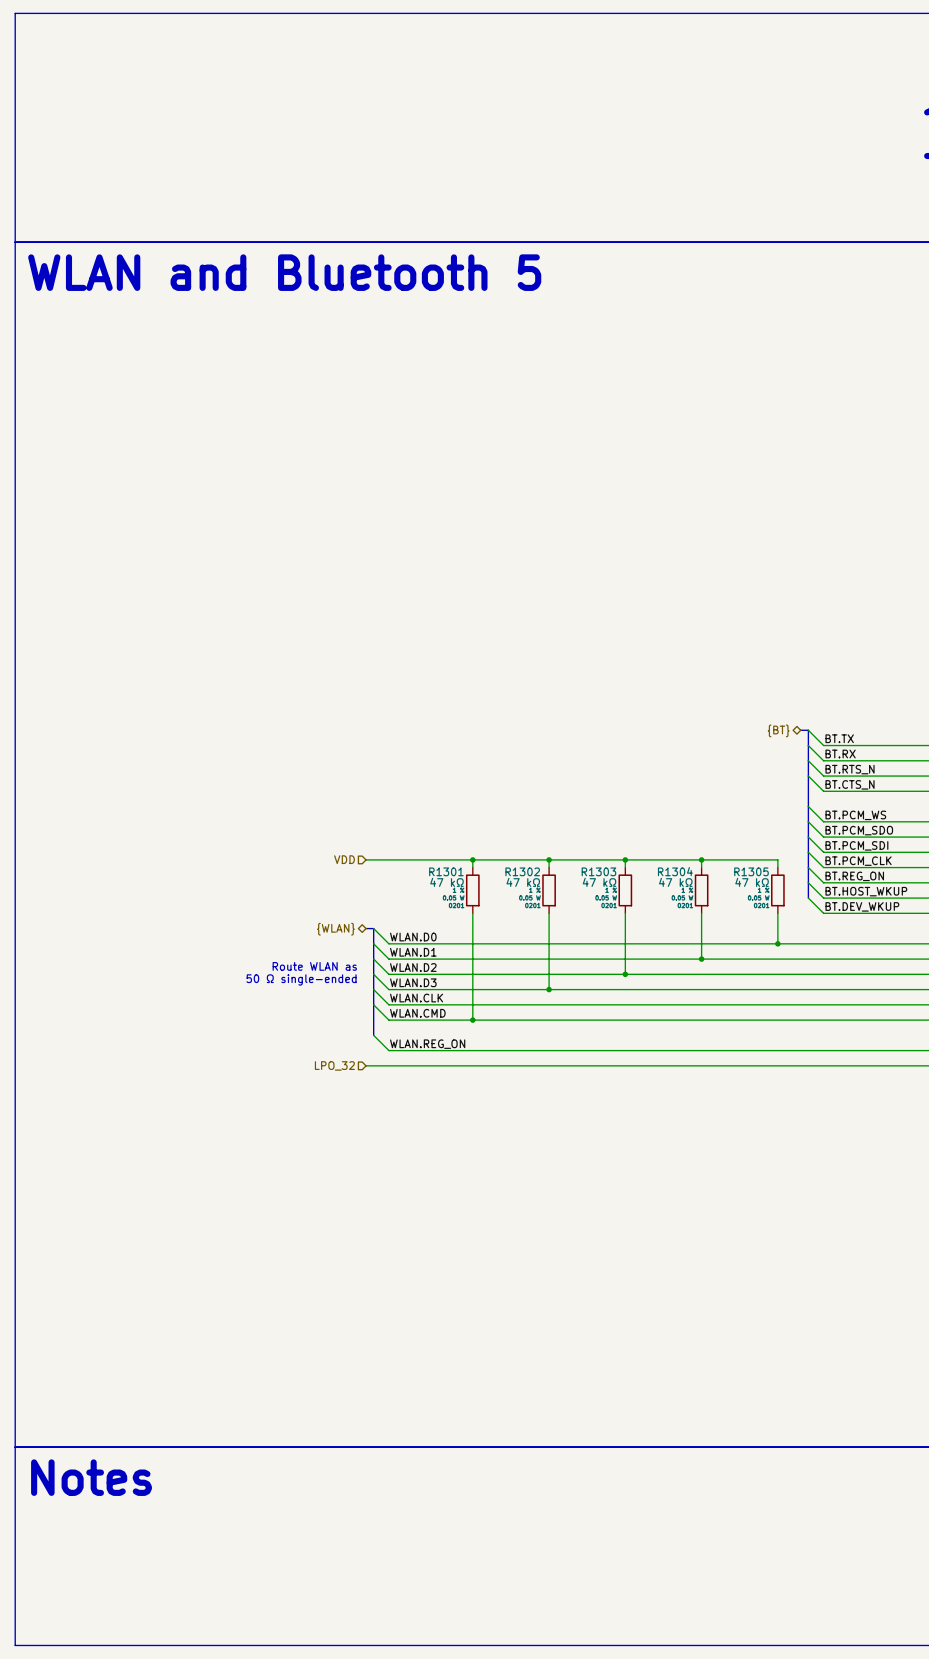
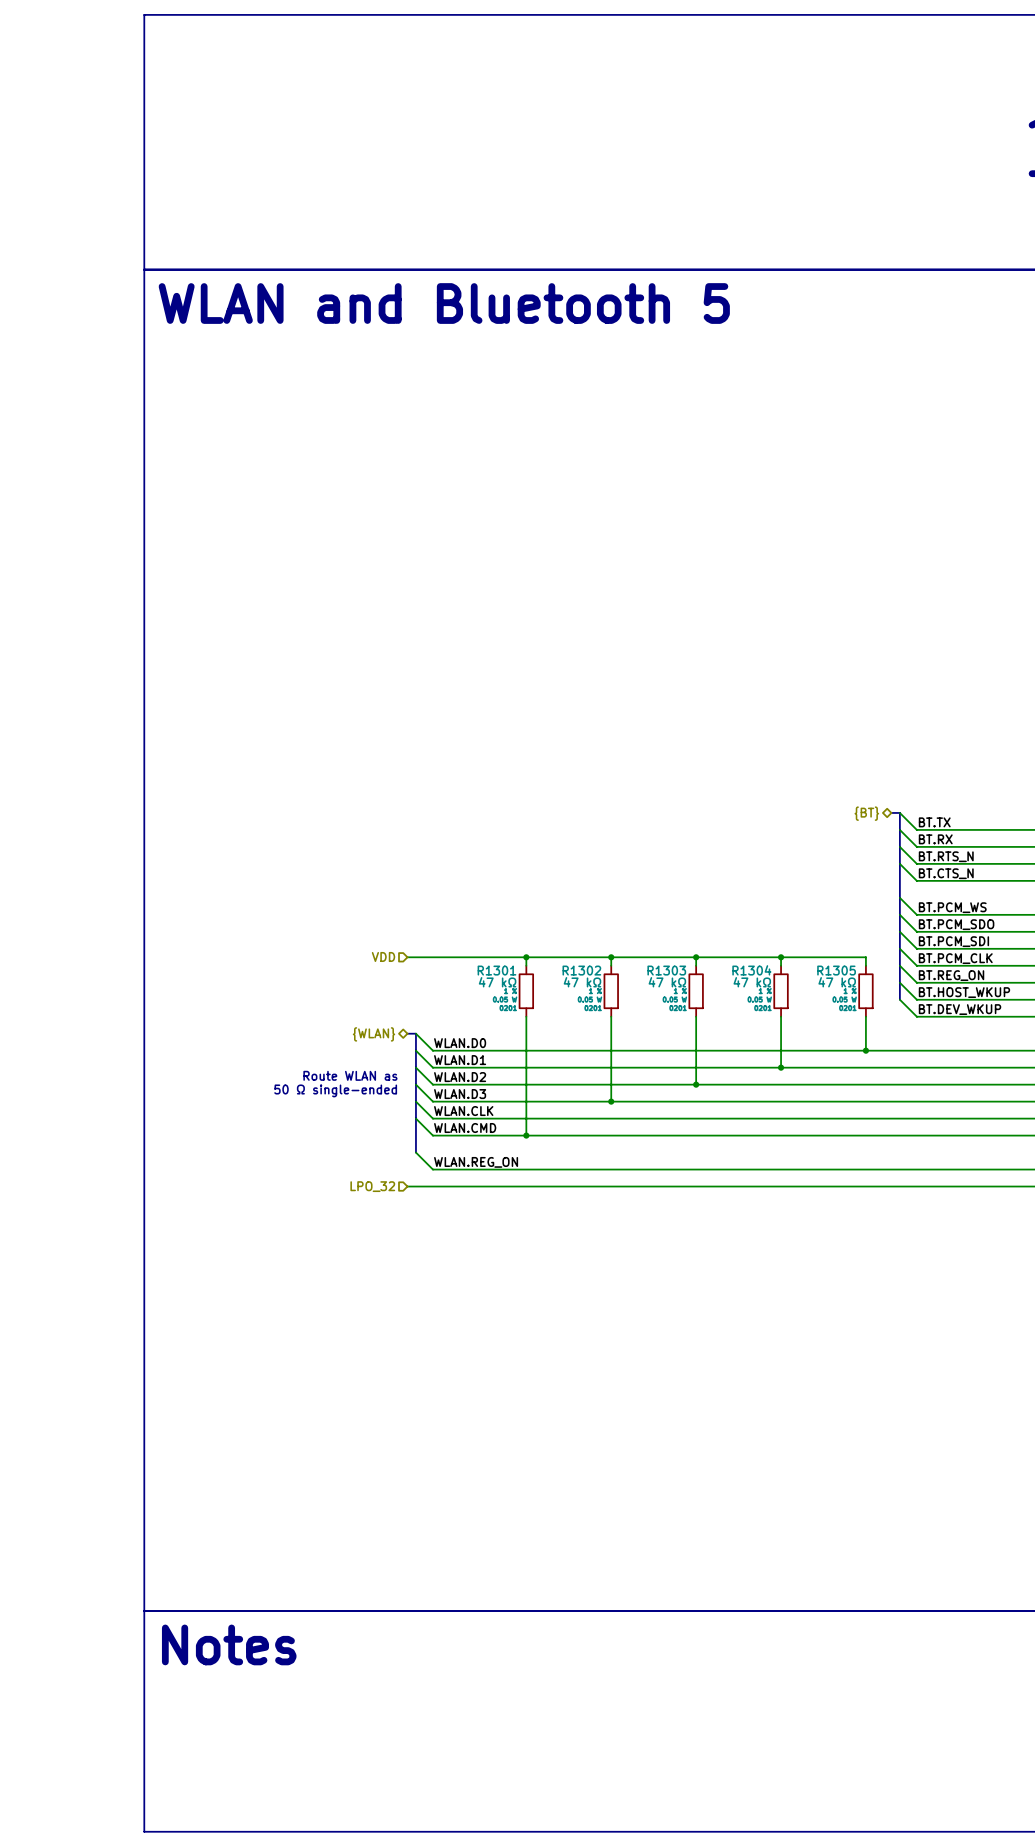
line: (129, 13) (15, 13) (15, 1645) (129, 1645) -> (144, 14) (144, 1831)
line: (15, 242) (129, 242) -> none
text position: WLAN and Bluetooth 5 (284, 272) -> WLAN and Bluetooth 5 (444, 303)
line: (15, 1447) (129, 1447) -> none
text position: Notes (91, 1477) -> Notes (229, 1644)

